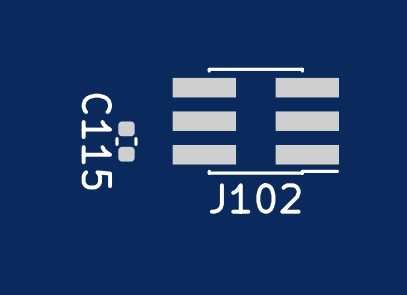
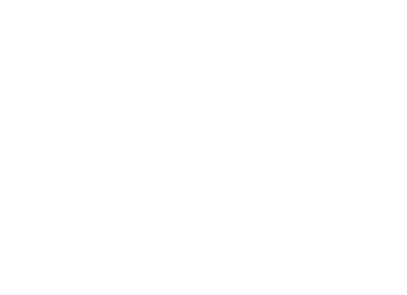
J102: (255, 121) -> none
C115: (126, 141) -> none

